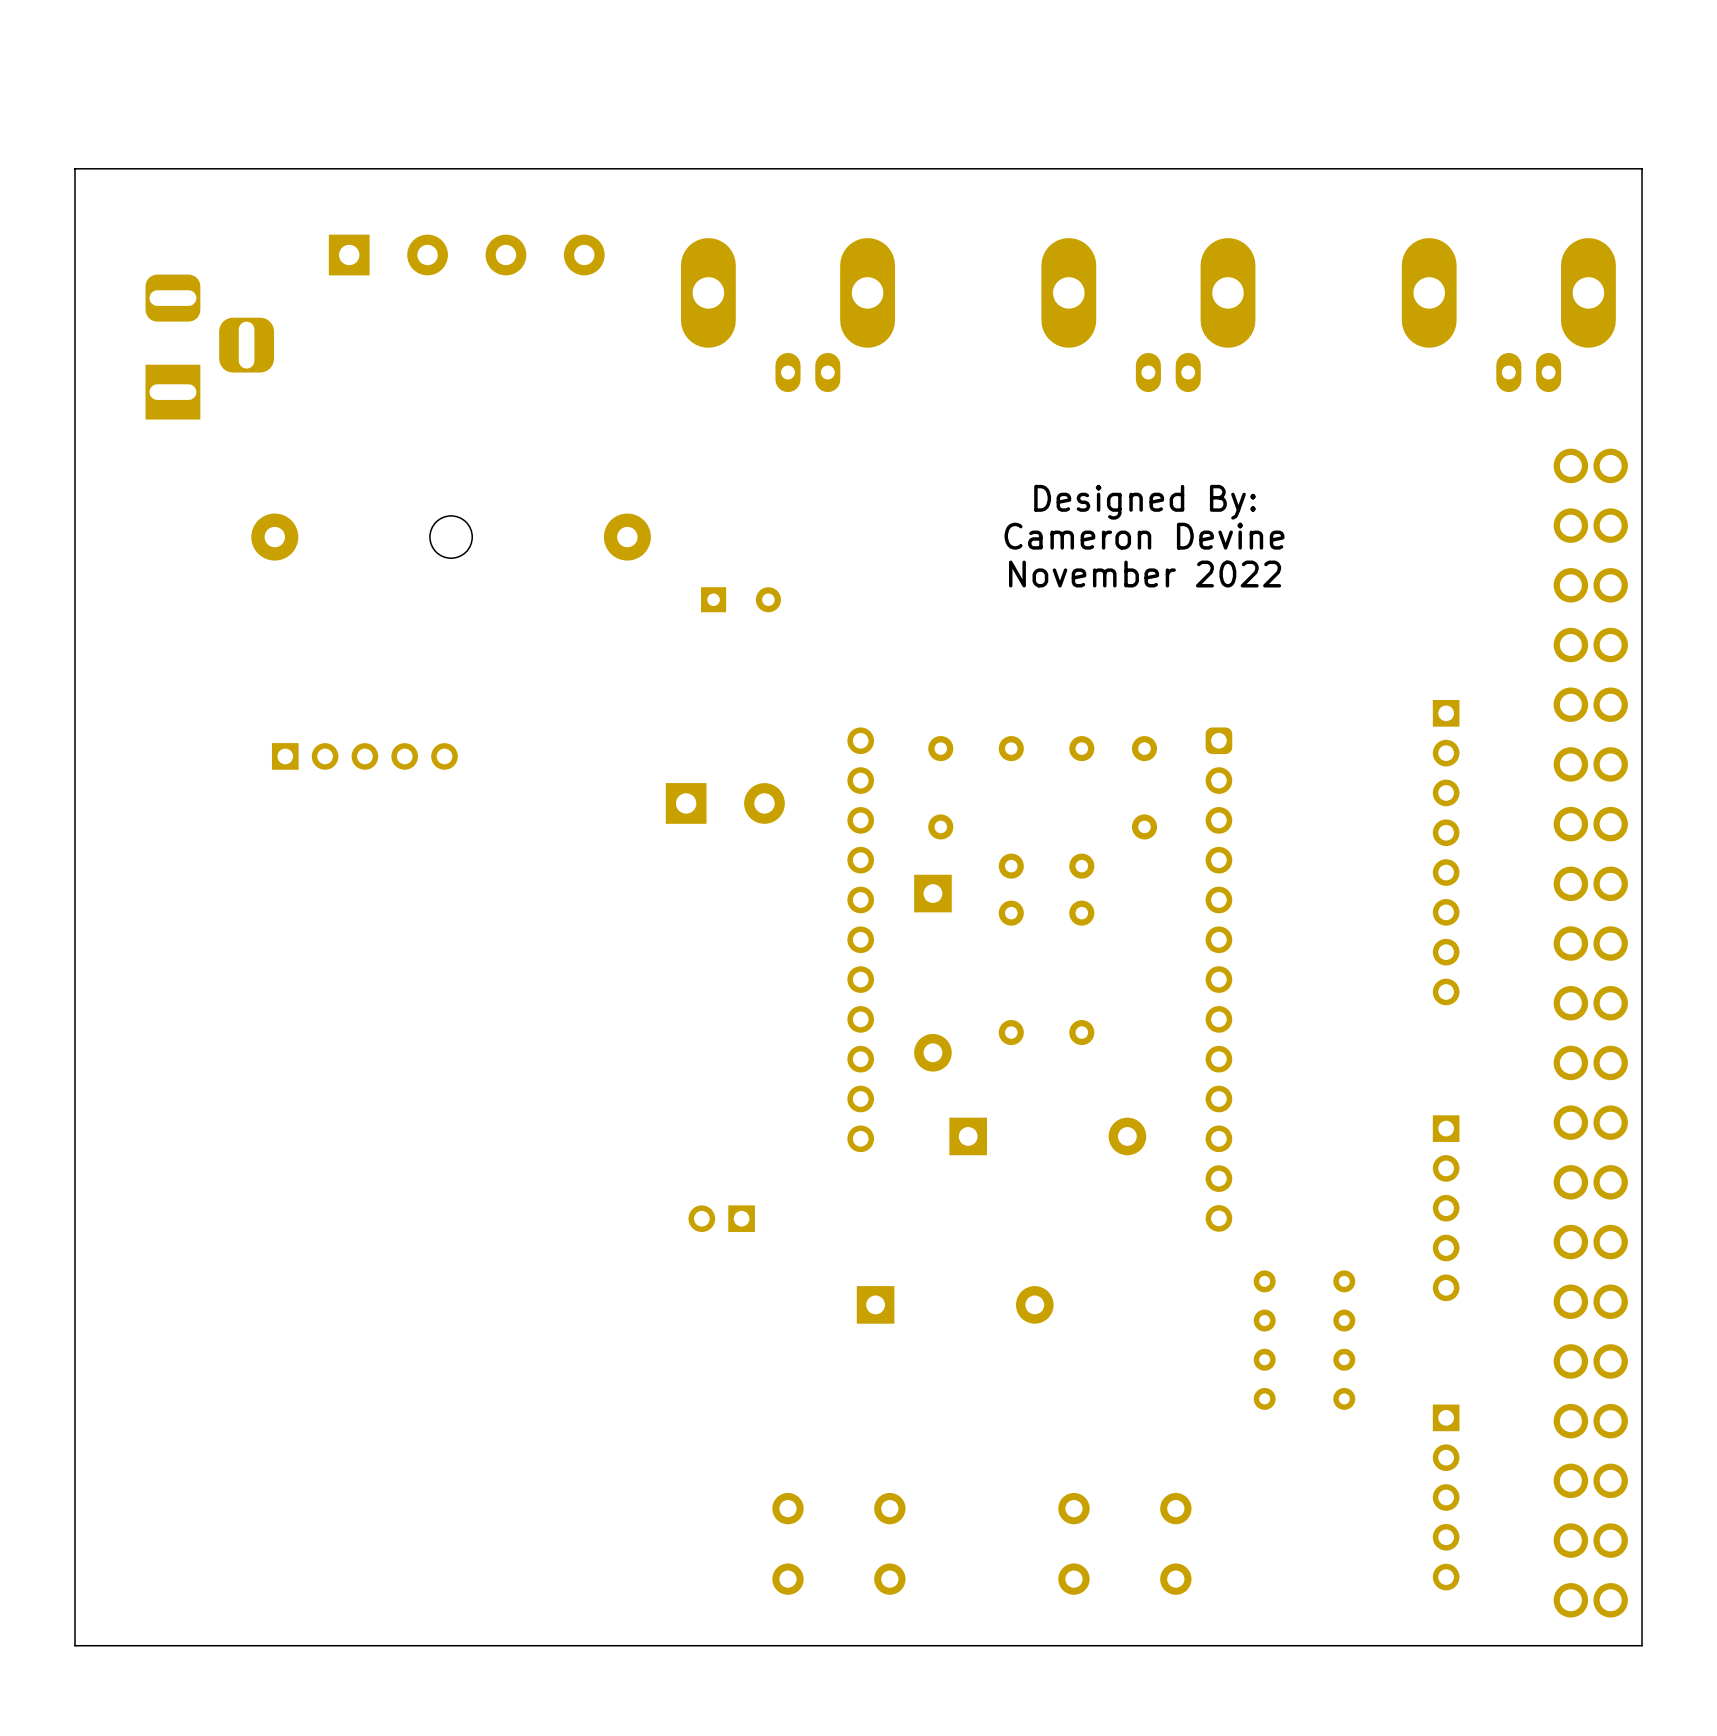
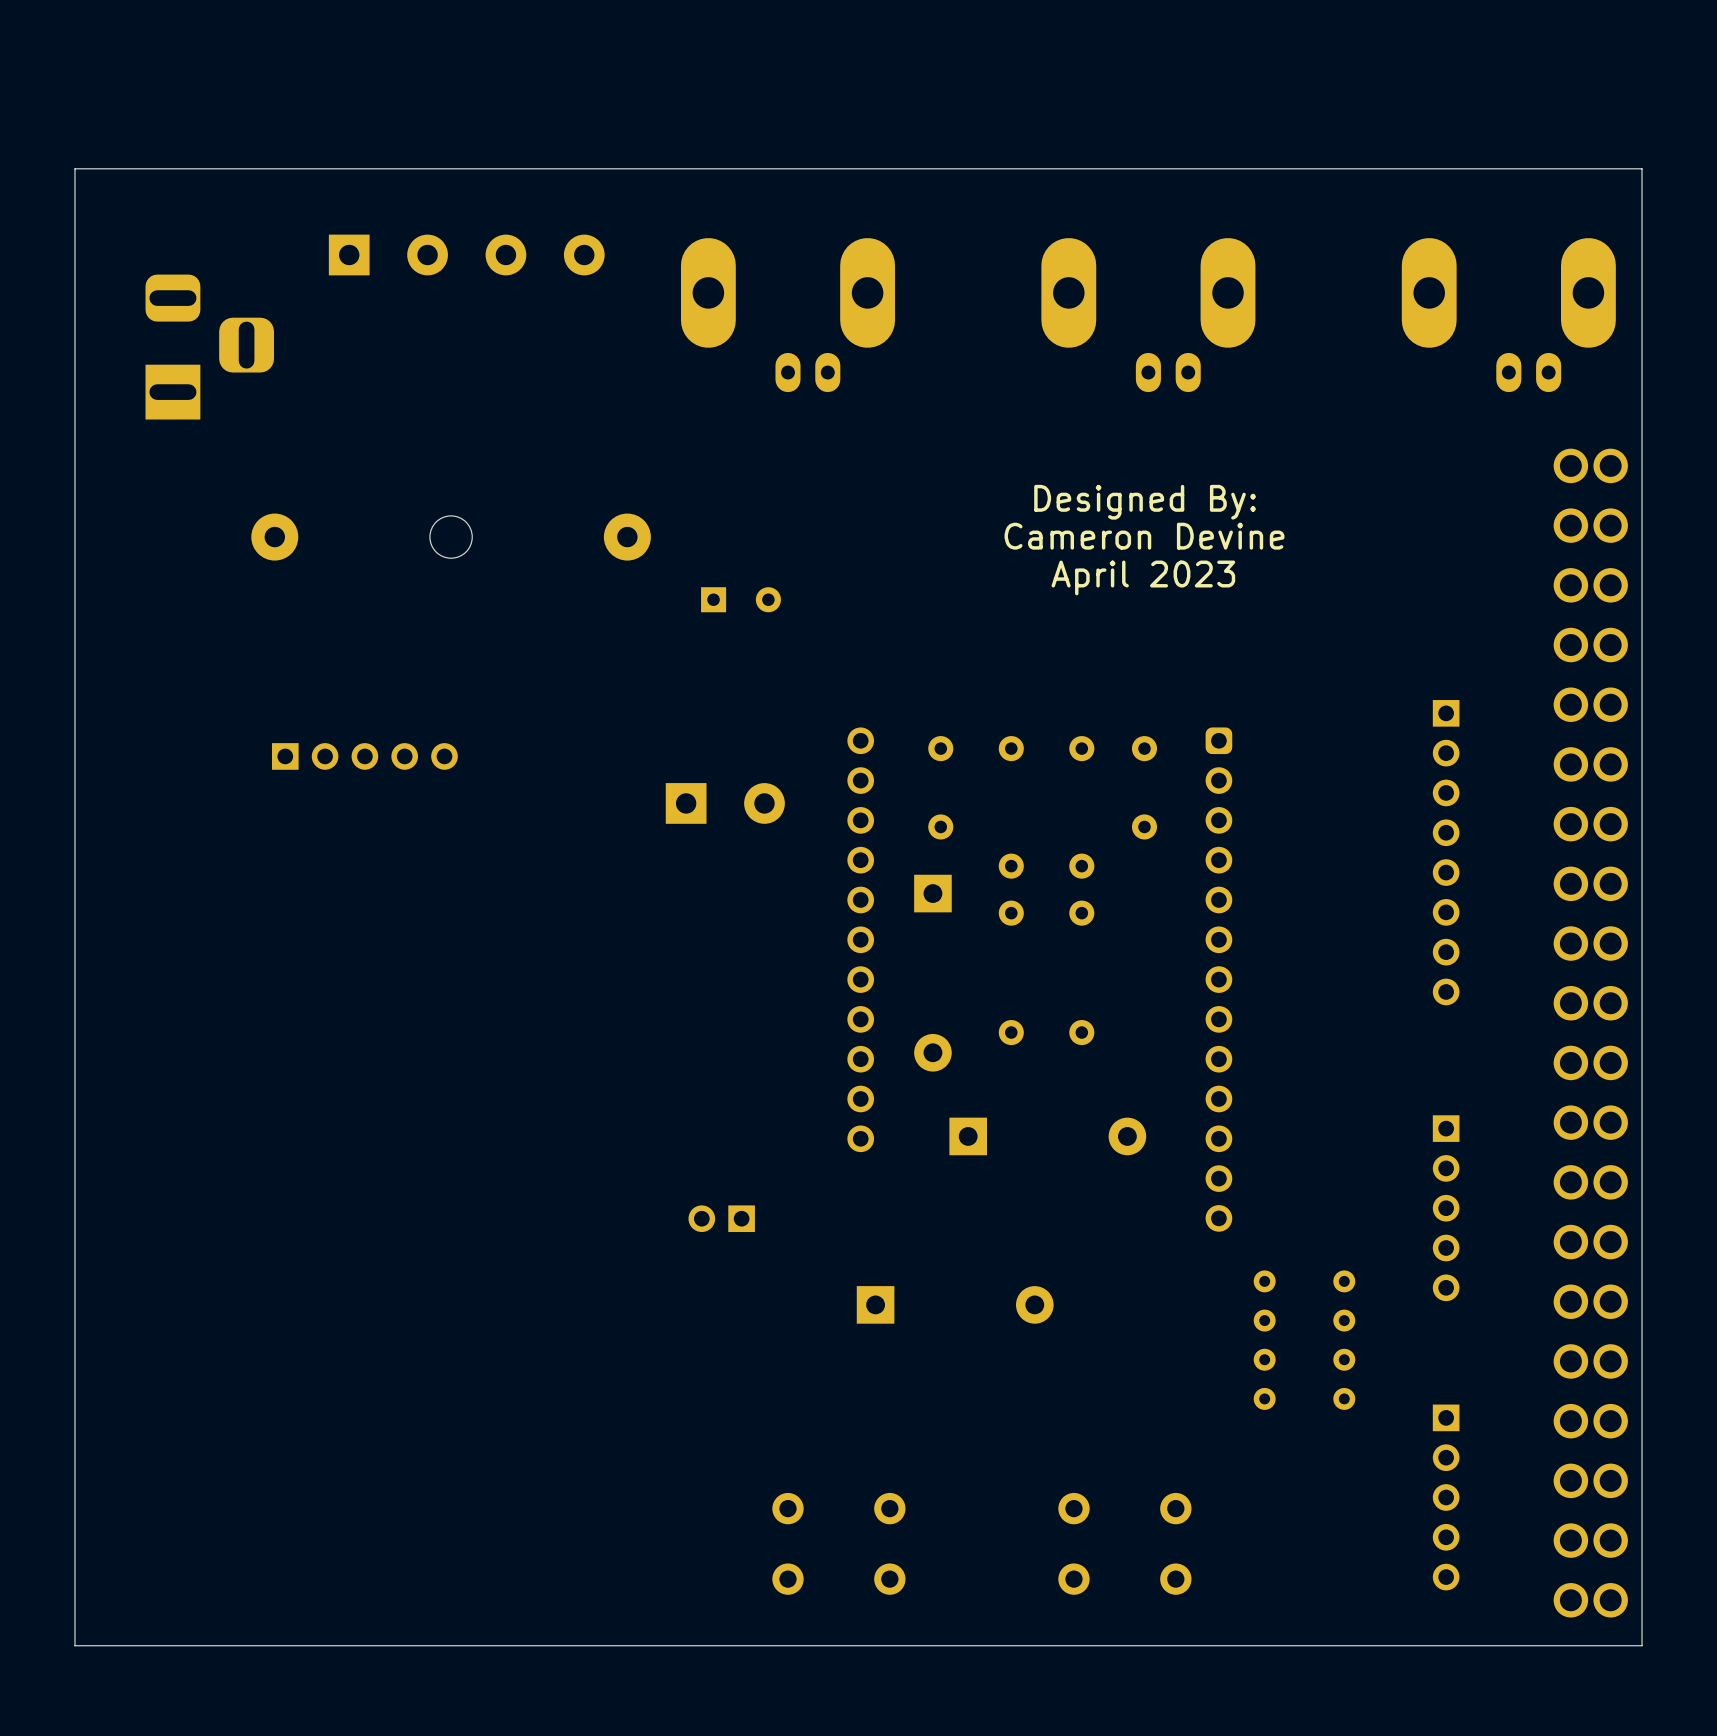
text: November 2022 (1145, 574) -> April 2023 (1143, 577)

